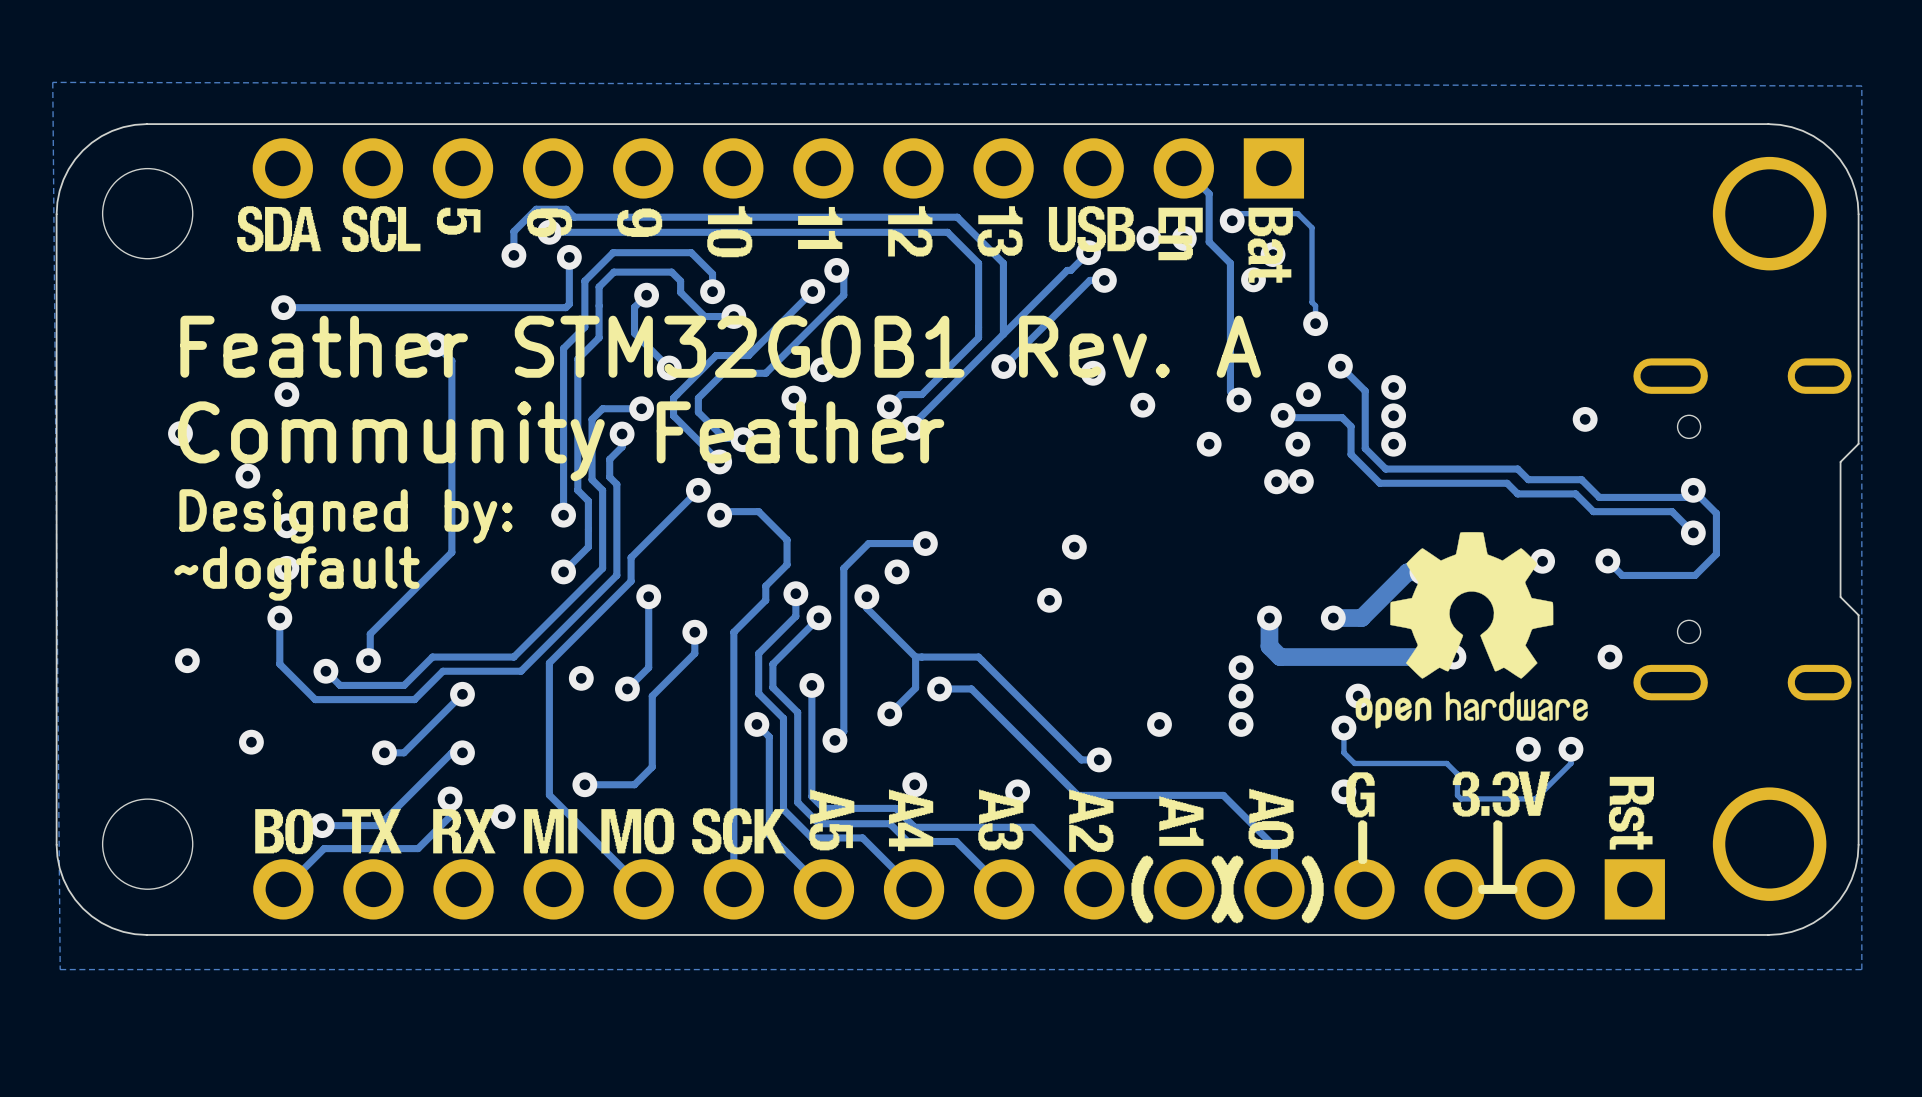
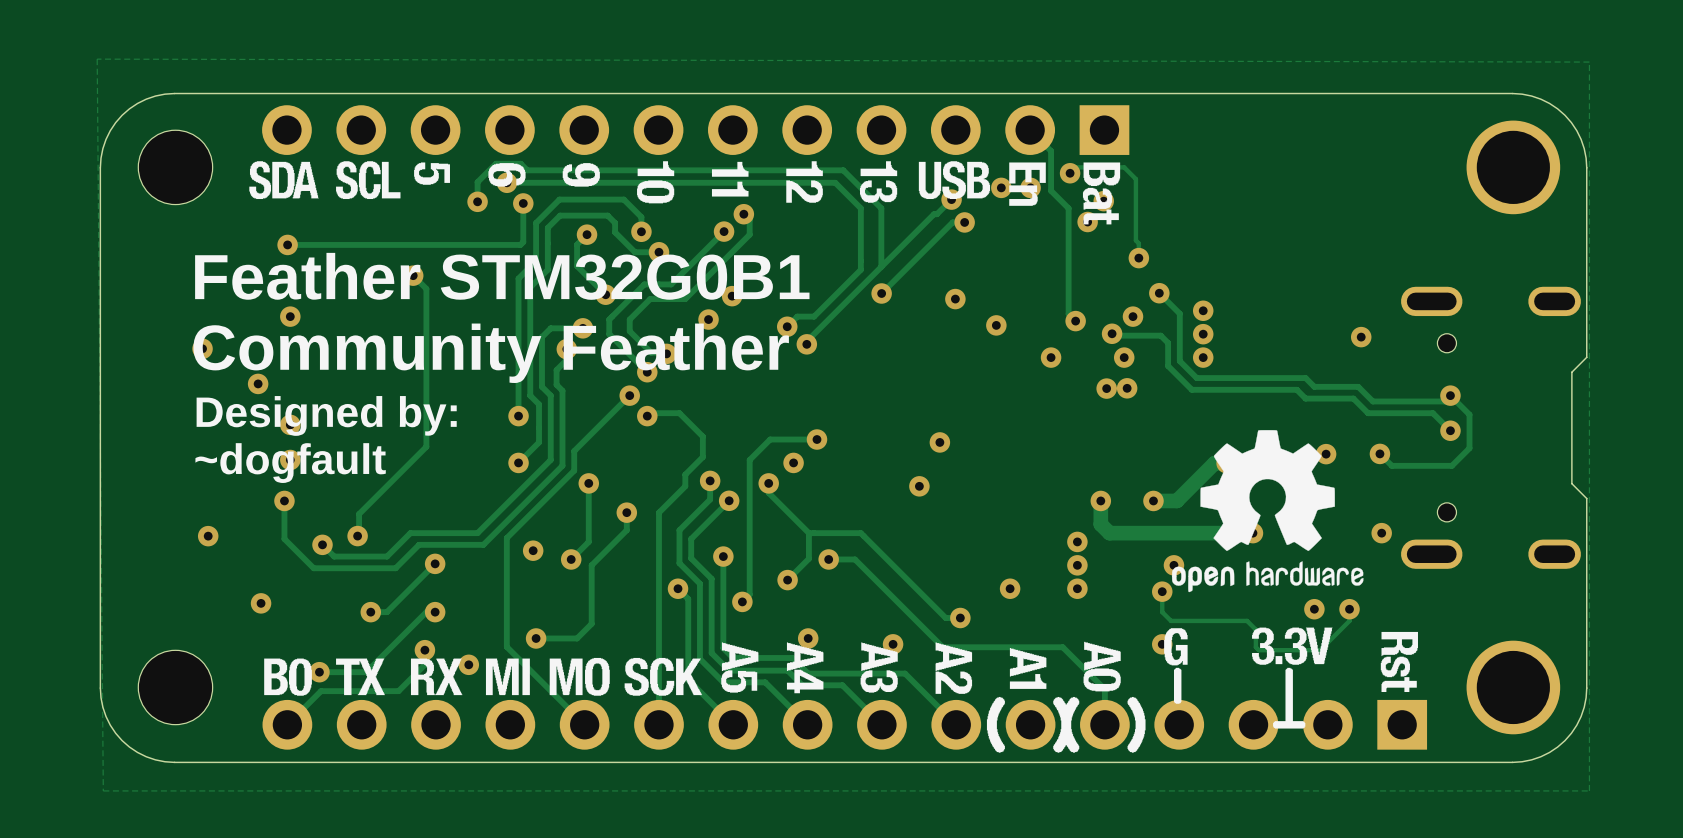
text: Feather STM32G0B1 Rev. A (720, 346) -> Feather STM32G0B1 (502, 276)

